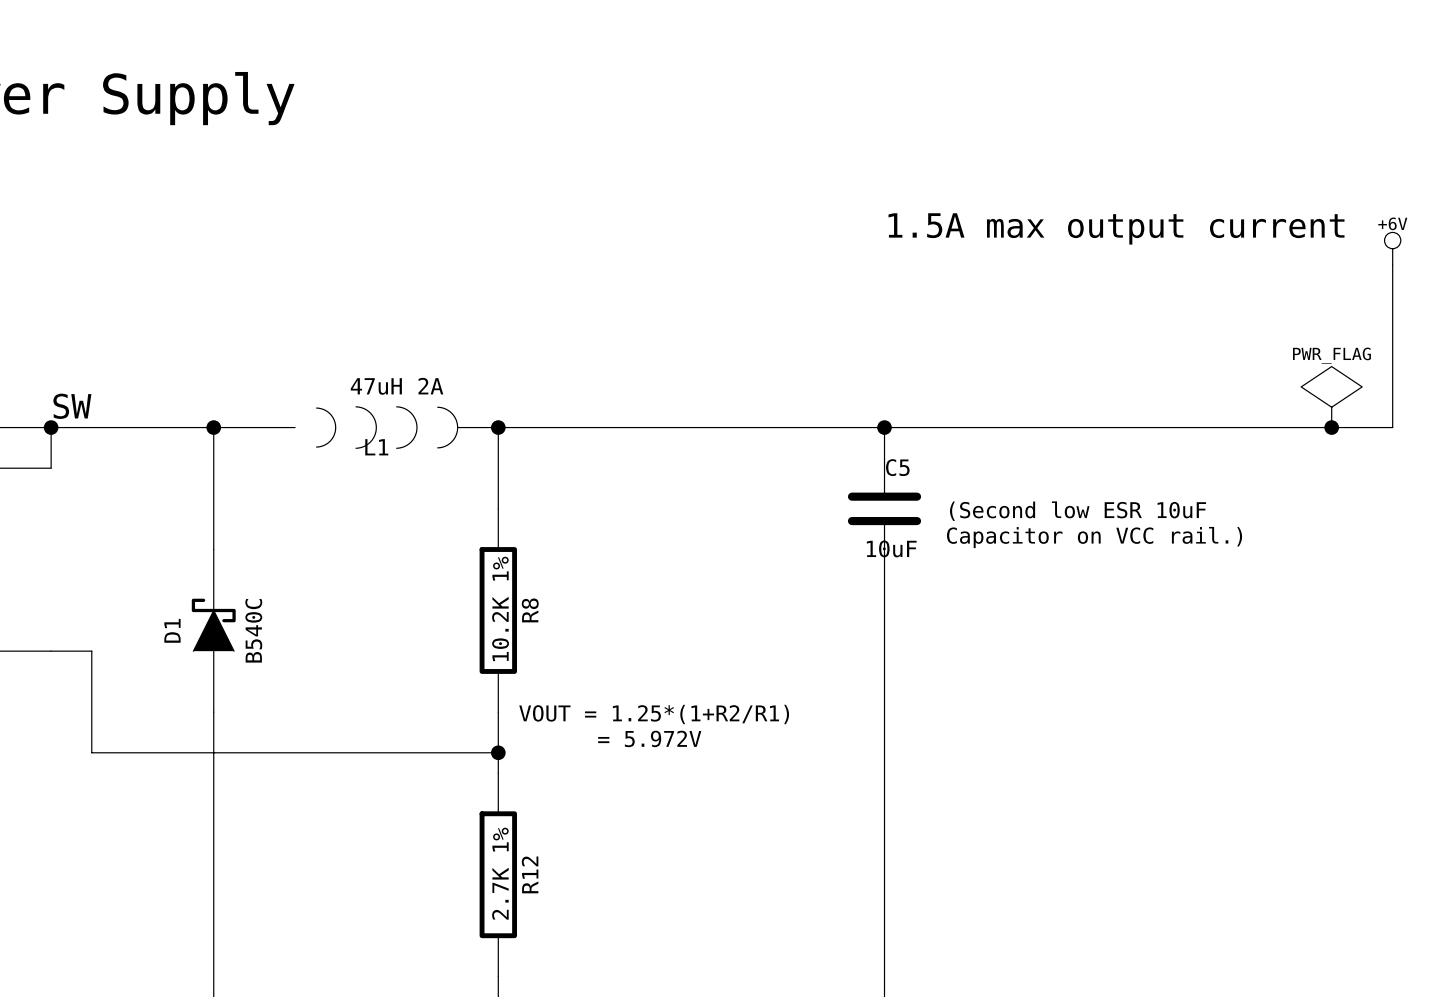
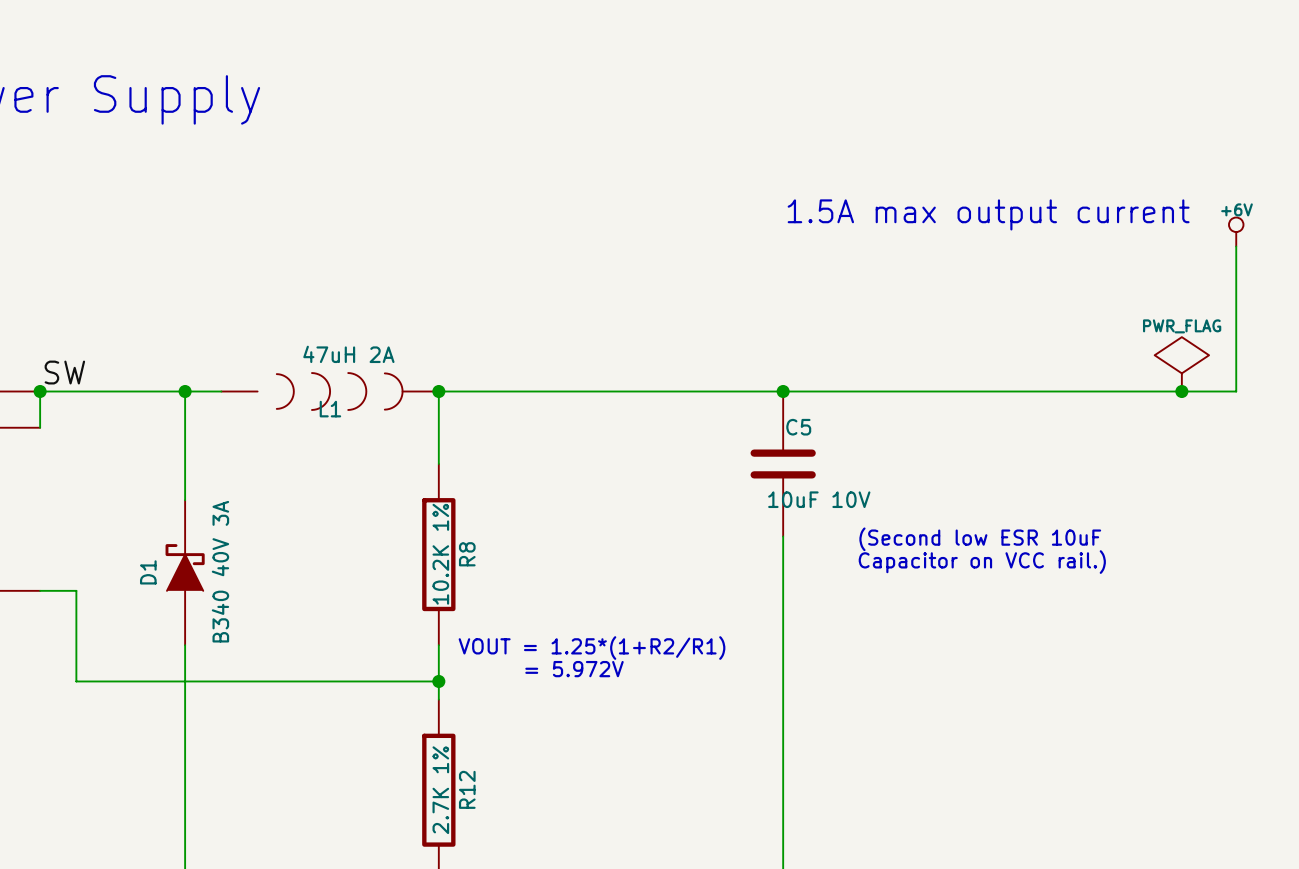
text position: (Second low ESR 10uF (1078, 511) -> (Second low ESR 10uF (980, 539)
text position: Capacitor on VCC rail.) (1094, 537) -> Capacitor on VCC rail.) (982, 562)
C5 value: 10uF (891, 548) -> 10uF 10V (819, 499)
D1 value: B540C (253, 630) -> B340 40V 3A (220, 571)

